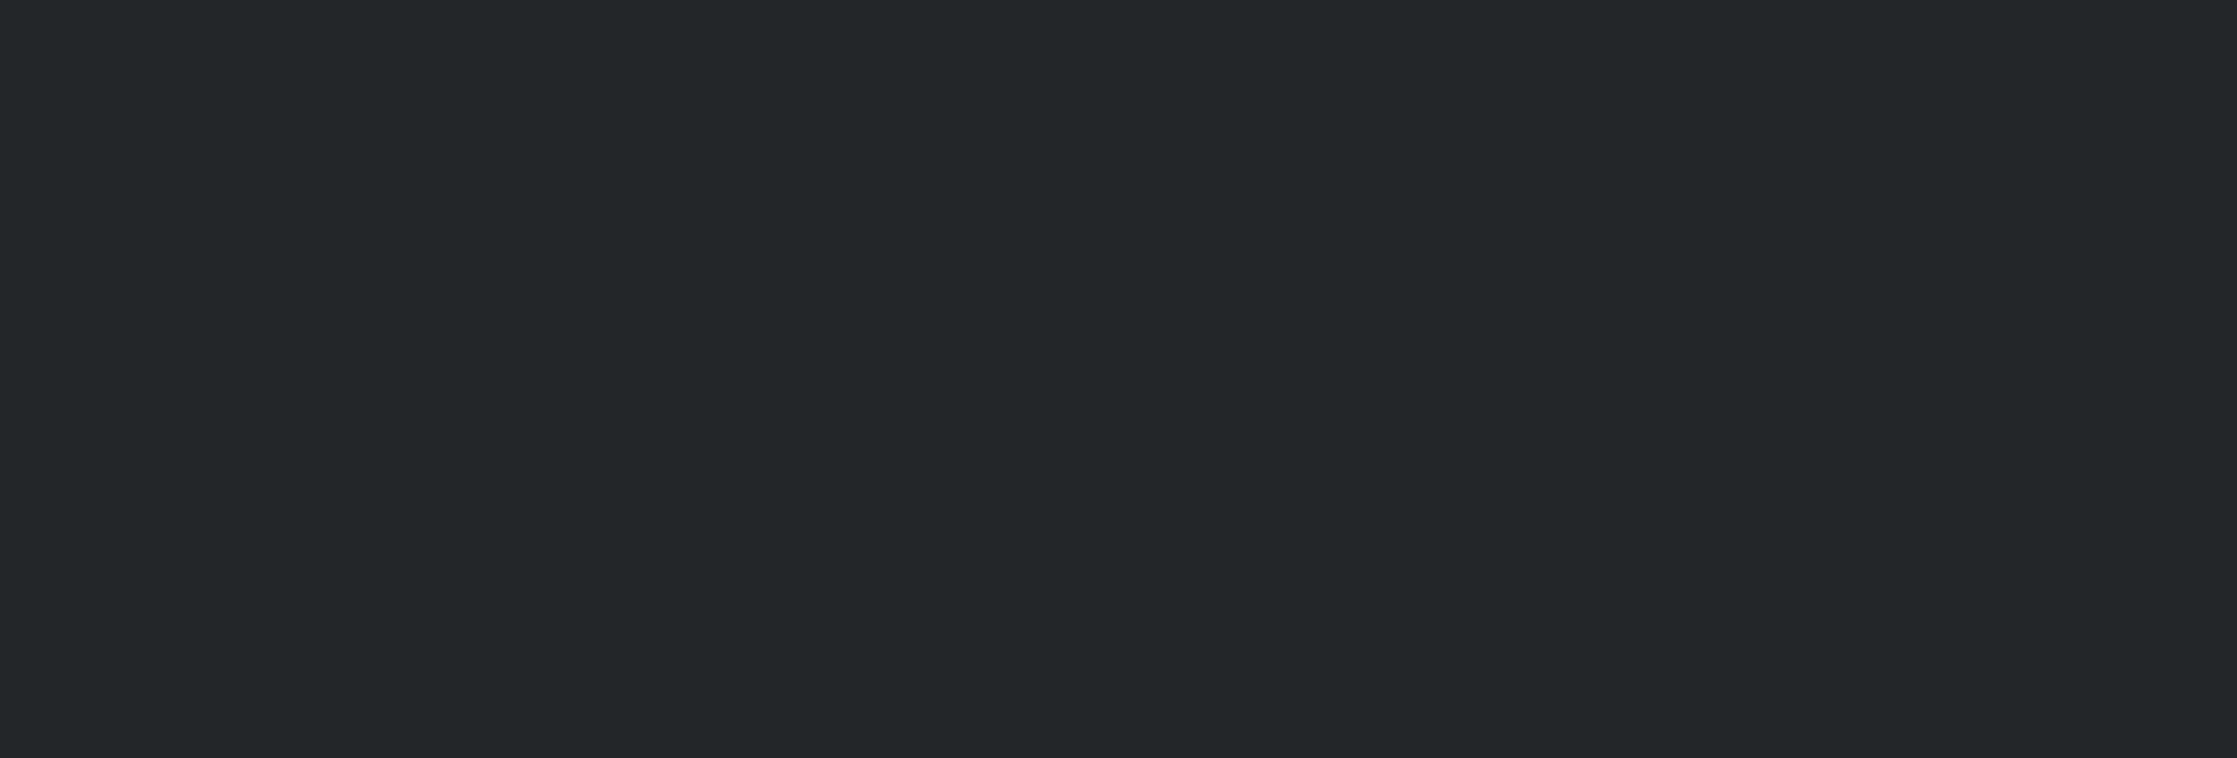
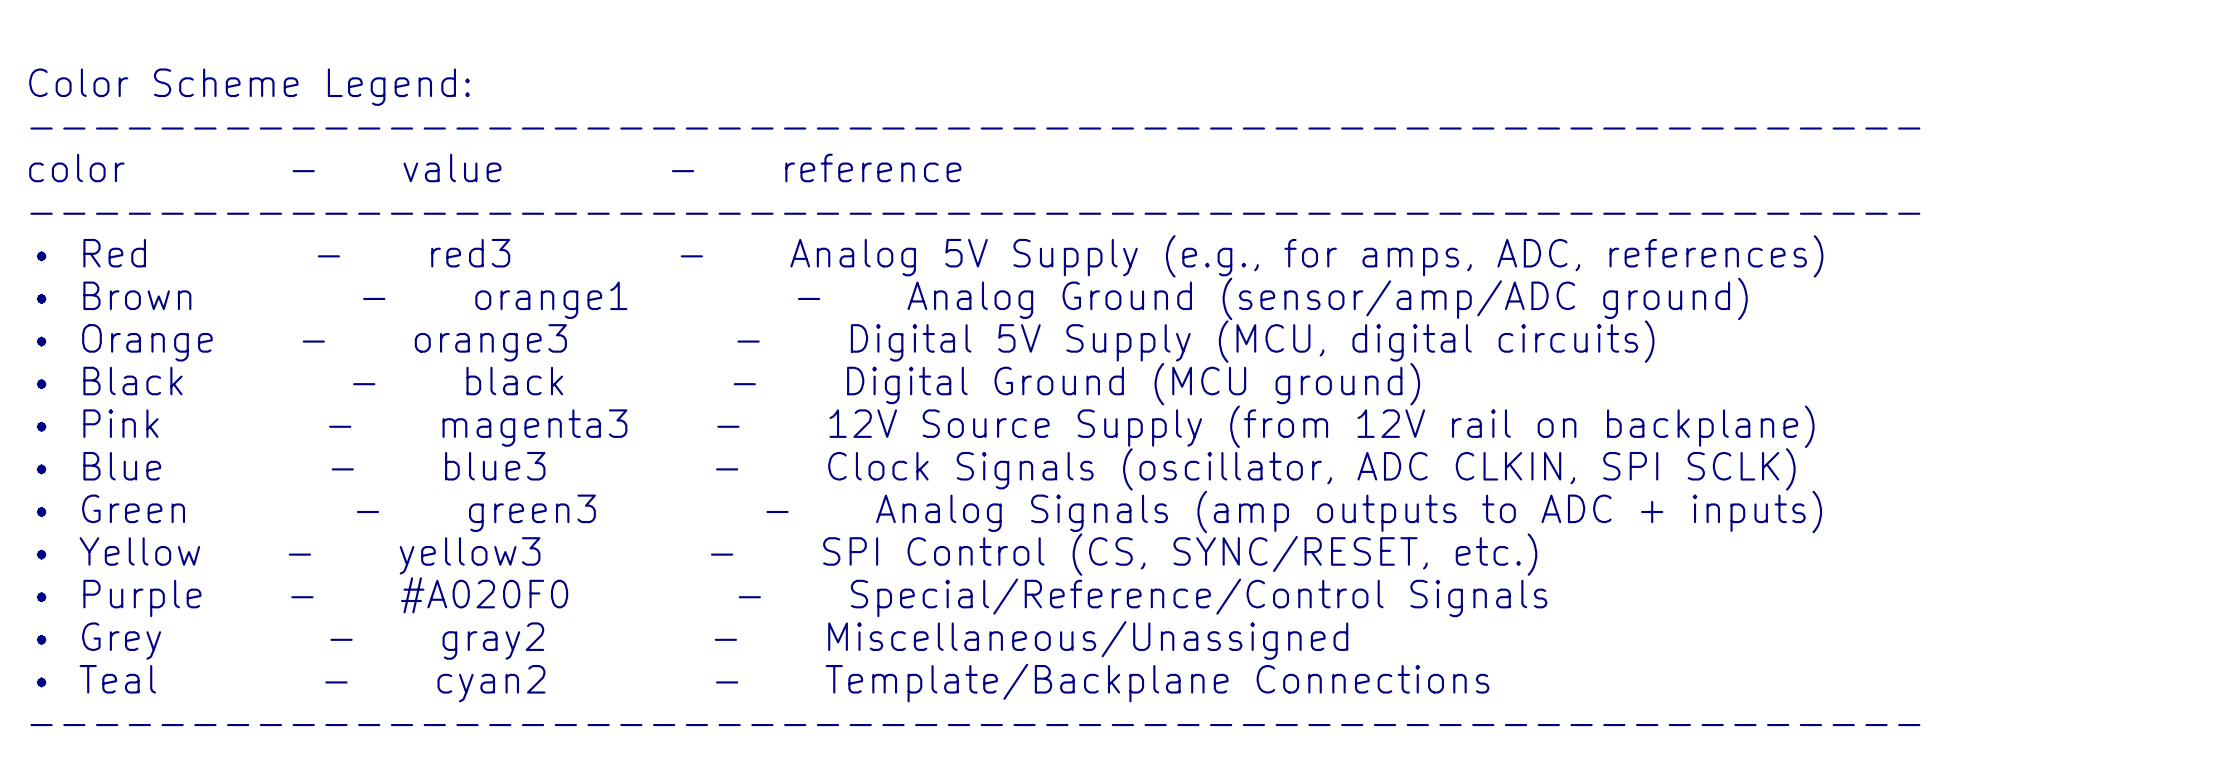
text: none -> Color Scheme Legend: (249, 87)
text: none -> ---------------------------------------------------------- (975, 128)
text: none -> color - value - reference (495, 167)
text: none -> ---------------------------------------------------------- (975, 213)
text: none -> • Red - red3 - Analog 5V Supply (e.g., for amps, ADC, references) (930, 256)
text: none -> • Brown - orange1 - Analog Ground (sensor/amp/ADC ground) (892, 298)
text: none -> • Orange - orange3 - Digital 5V Supply (MCU, digital circuits) (845, 341)
text: none -> • Black - black - Digital Ground (MCU ground) (728, 384)
text: none -> • Pink - magenta3 - 12V Source Supply (from 12V rail on backplane) (925, 426)
text: none -> • Blue - blue3 - Clock Signals (oscillator, ADC CLKIN, SPI SCLK) (916, 469)
text: none -> • Green - green3 - Analog Signals (amp outputs to ADC + inputs) (929, 512)
text: none -> • Yellow - yellow3 - SPI Control (CS, SYNC/RESET, etc.) (787, 554)
text: none -> • Purple - #A020F0 - Special/Reference/Control Signals (792, 597)
text: none -> • Grey - gray2 - Miscellaneous/Unassigned (692, 640)
text: none -> • Teal - cyan2 - Template/Backplane Connections (763, 683)
text: none -> ---------------------------------------------------------- (975, 725)

